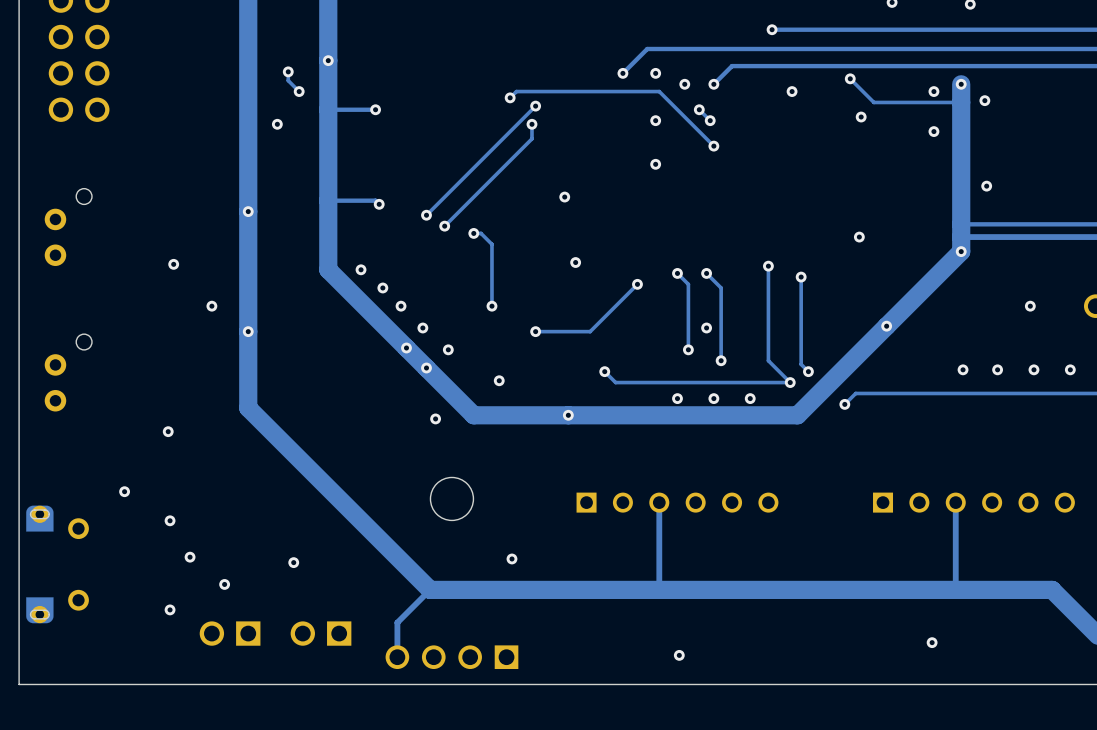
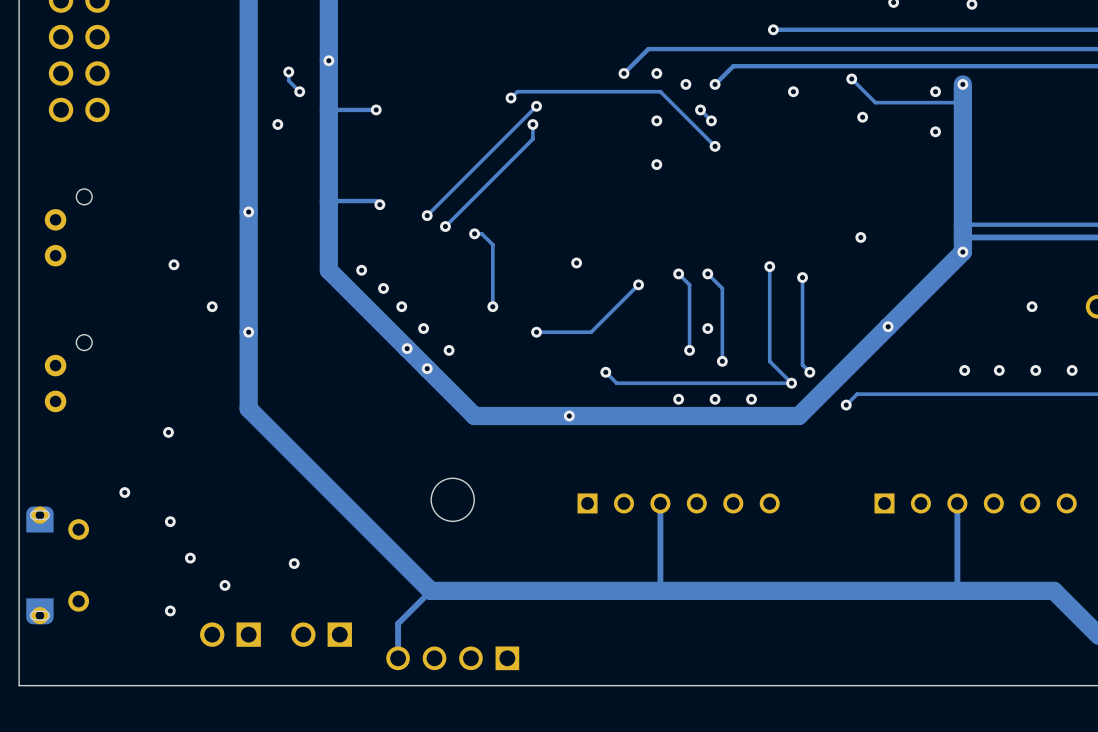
via: (984, 100) -> none
via: (986, 186) -> none
via: (564, 197) -> none
via: (499, 380) -> none
via: (435, 418) -> none
via: (511, 558) -> none
via: (932, 642) -> none
via: (679, 655) -> none

